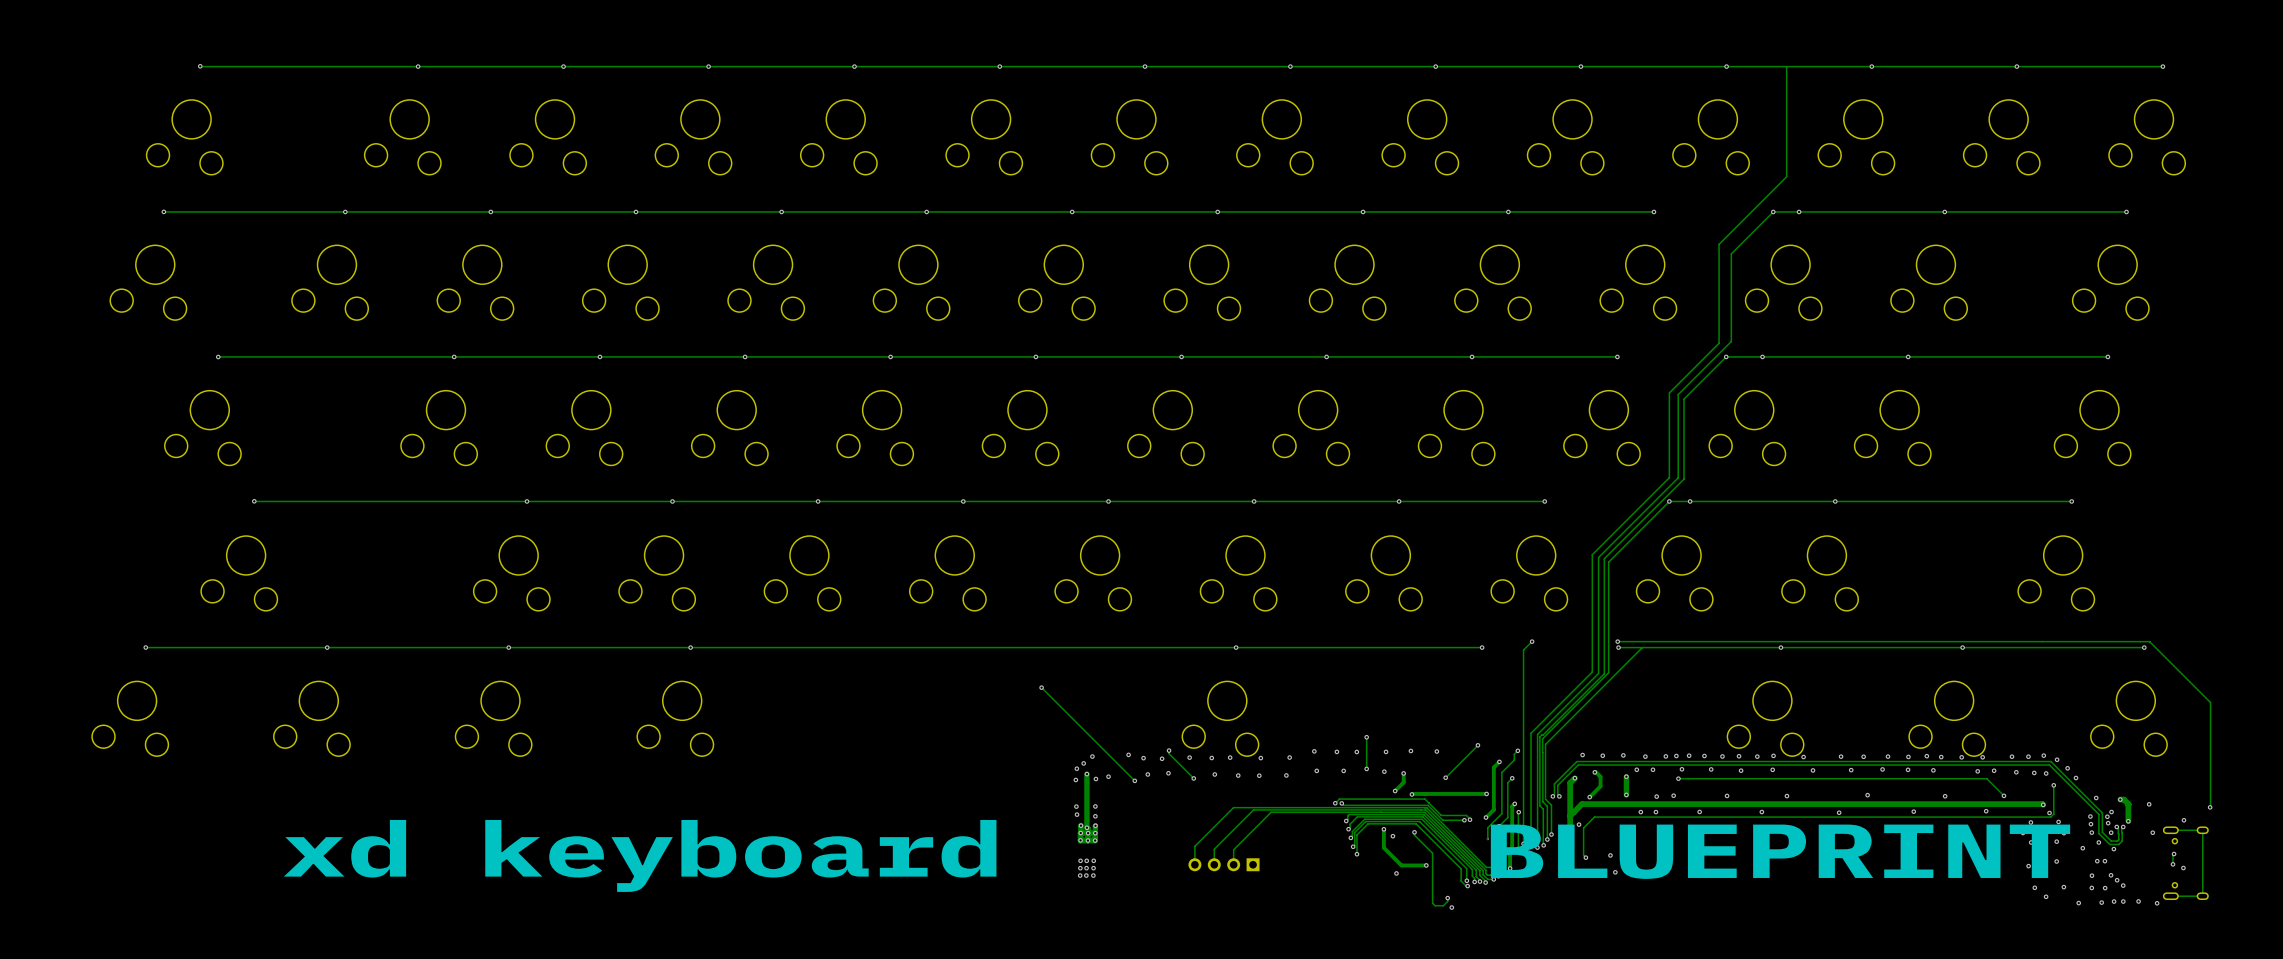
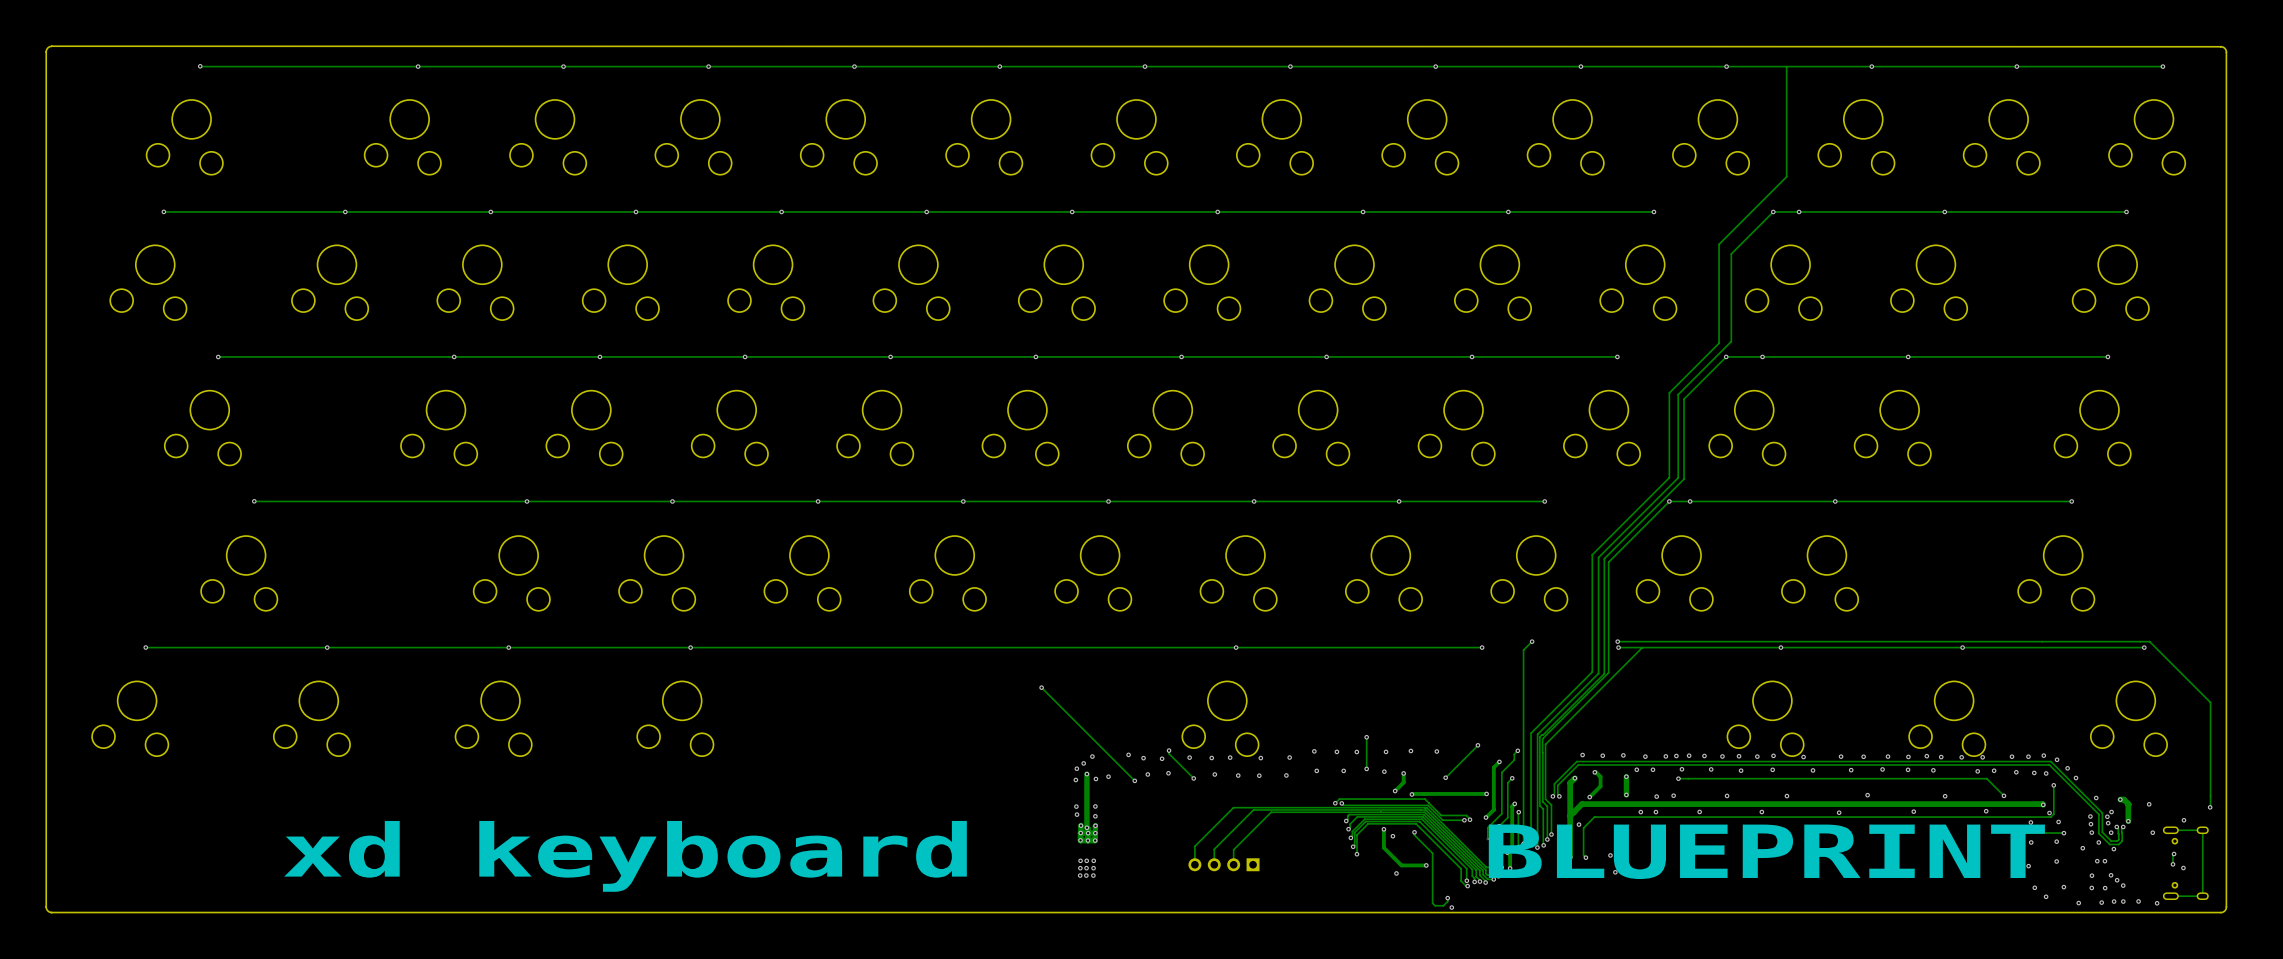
board edge: none -> (51, 46) (2220, 46)
board edge: none -> (51, 46) (47, 47) (46, 51) (46, 906) (47, 910) (51, 912)
board edge: none -> (2220, 46) (2224, 48) (2226, 52)
board edge: none -> (2226, 52) (2226, 906)
board edge: none -> (2226, 906) (2224, 910) (2220, 912) (51, 912)

